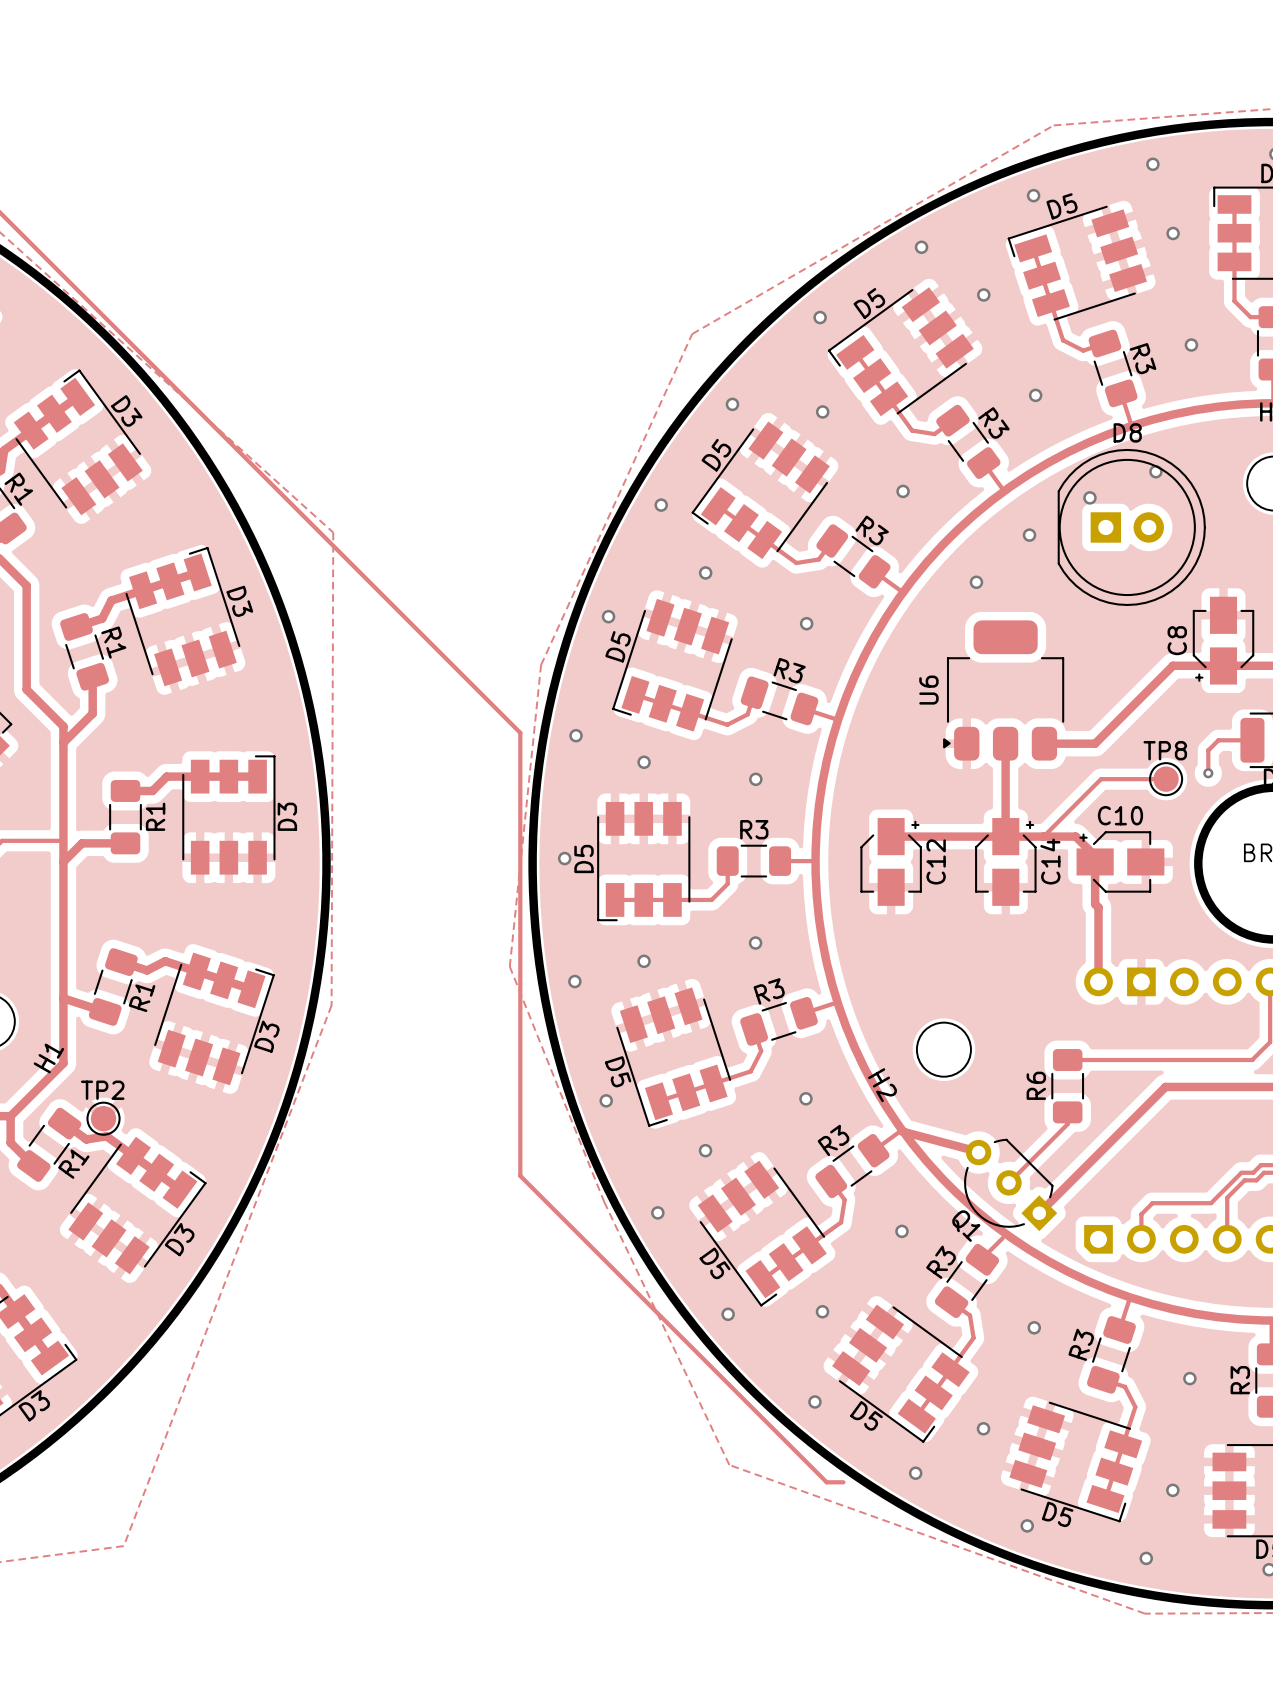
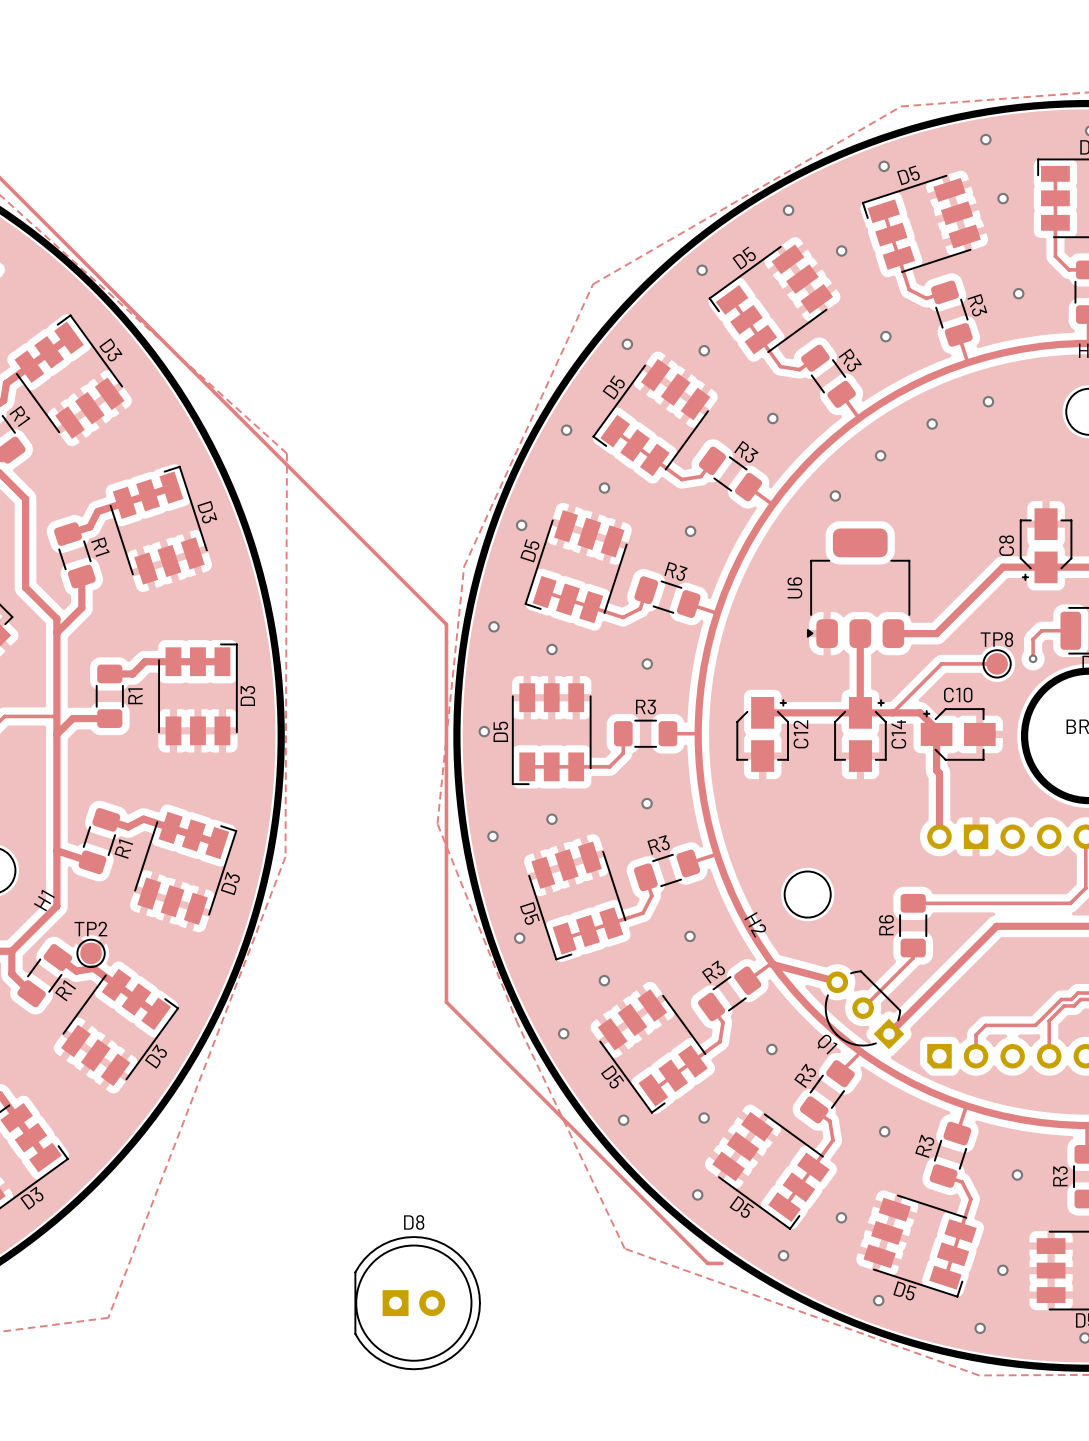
D8 position: (1131, 527) -> (417, 1303)

